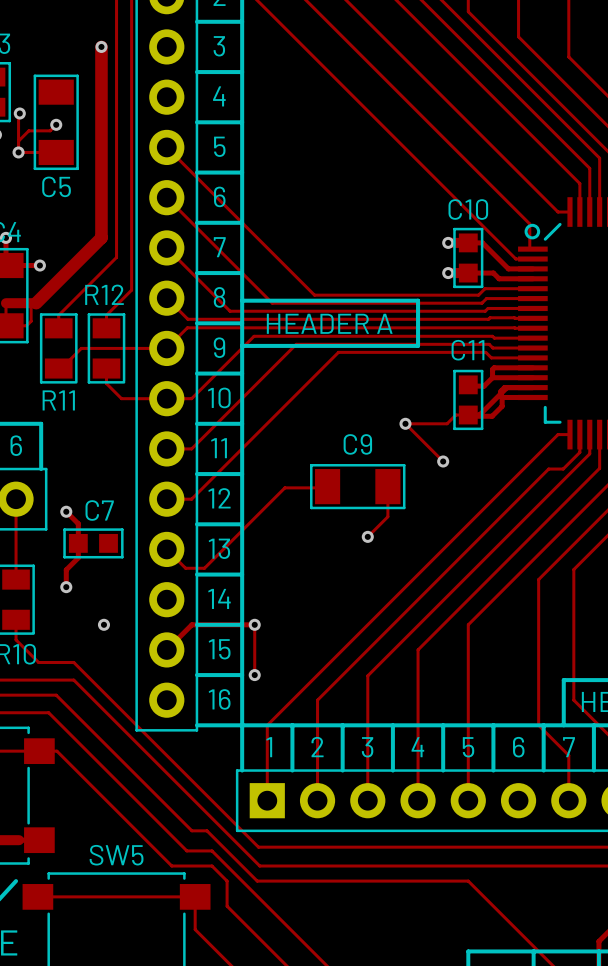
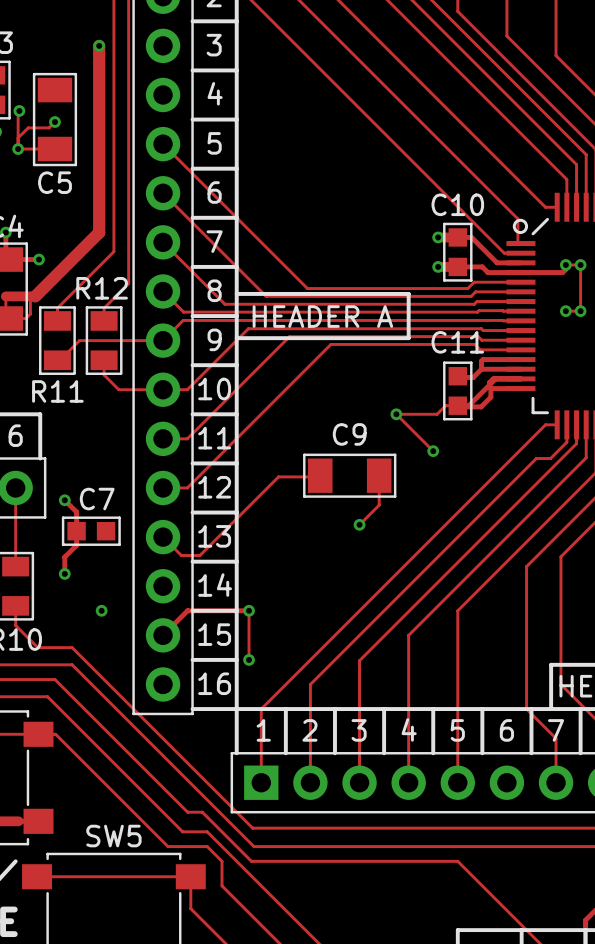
via: none -> (565, 264)
via: none -> (580, 264)
track: none -> (520, 272) (562, 272) (565, 269) (565, 264) (580, 264) (580, 311) (565, 311)
via: none -> (565, 311)
via: none -> (580, 311)

